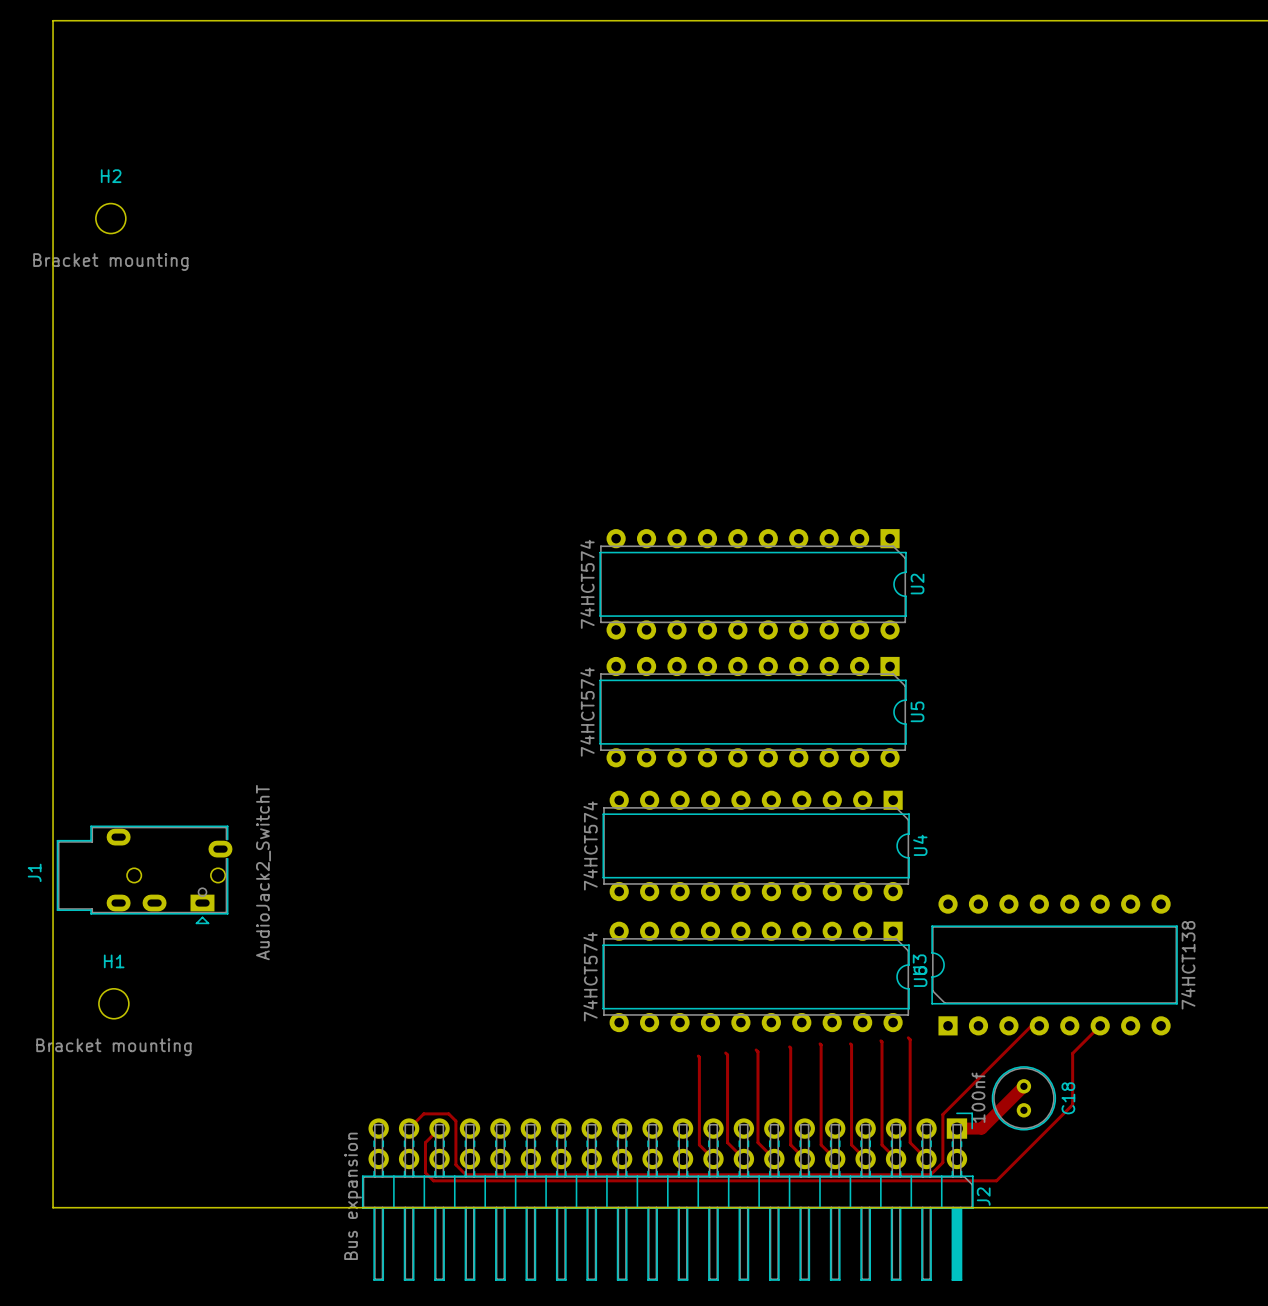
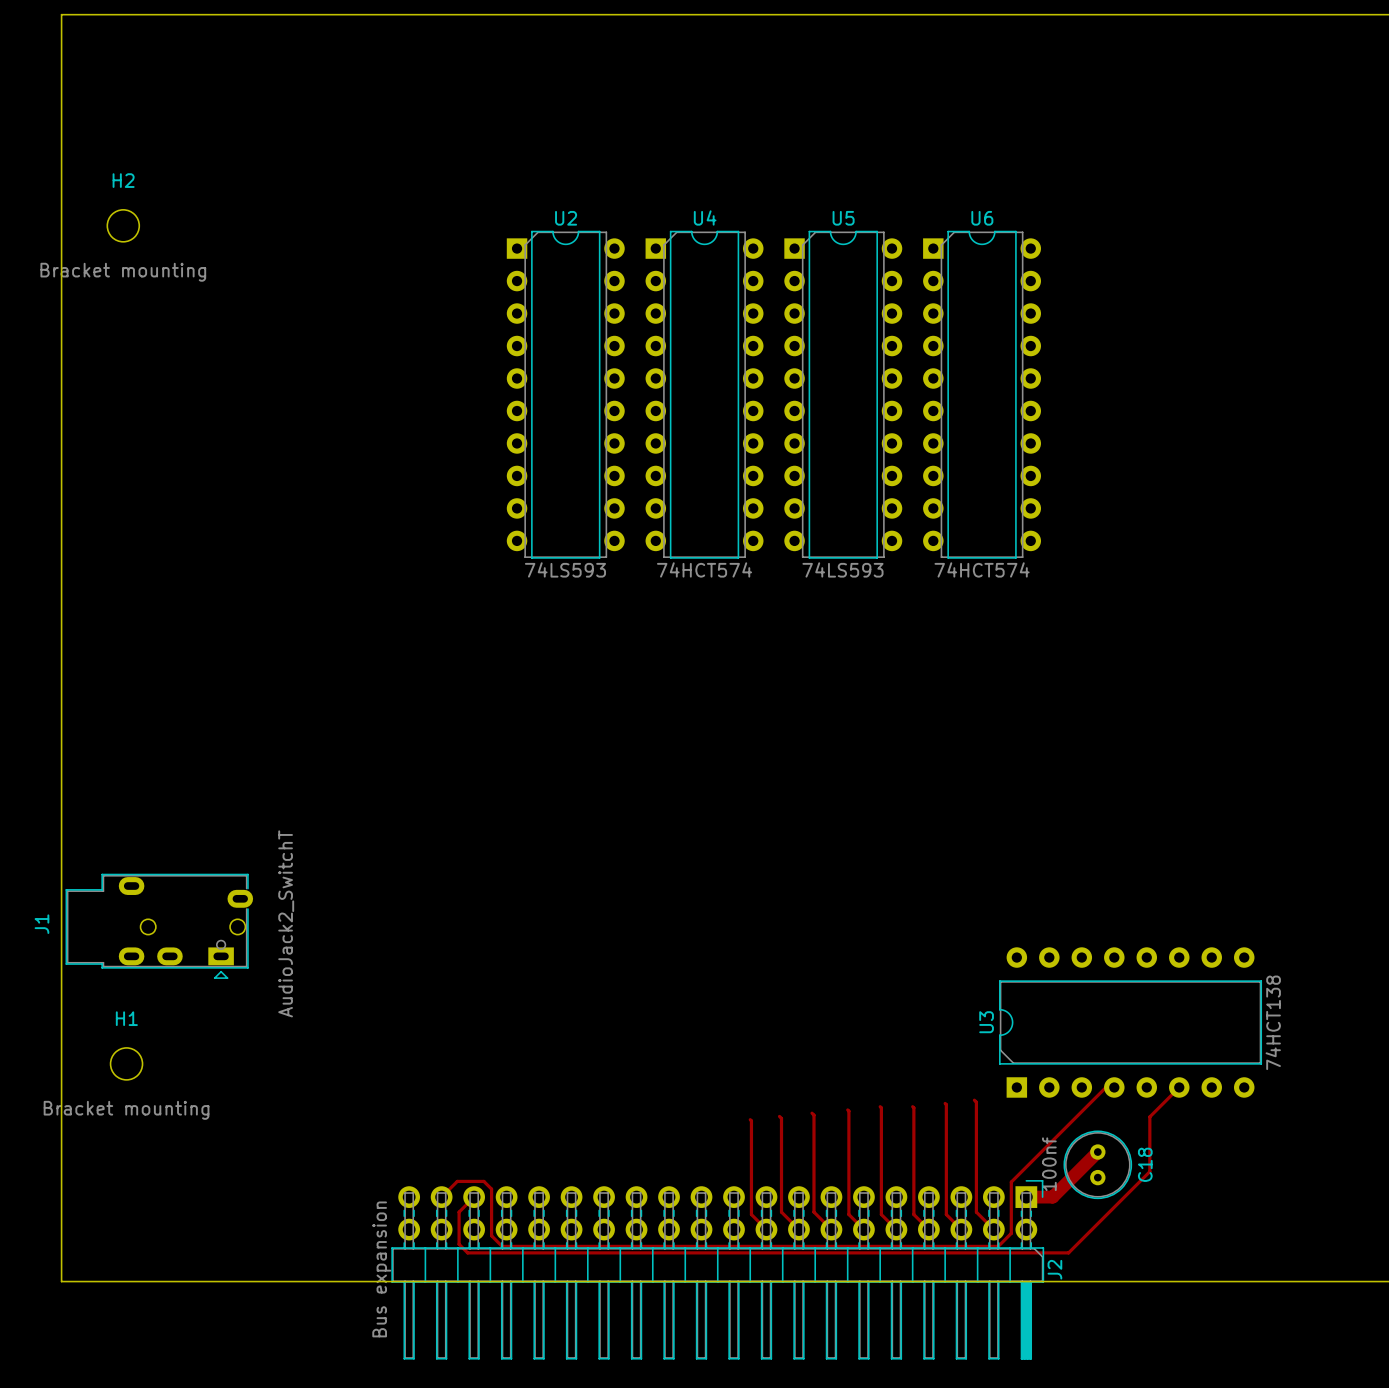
U2 value: 74HCT574 (587, 584) -> 74LS593 (565, 569)
U2 rotation: 0° (753, 584) -> 90° counterclockwise (565, 394)
U2 position: (753, 584) -> (565, 394)
U5 value: 74HCT574 (587, 712) -> 74LS593 (842, 569)
U5 rotation: 0° (753, 712) -> 90° counterclockwise (843, 394)
U5 position: (753, 712) -> (843, 394)
U4 rotation: 0° (756, 845) -> 90° counterclockwise (704, 394)
U4 position: (756, 845) -> (704, 394)
U6 rotation: 0° (756, 976) -> 90° counterclockwise (982, 394)
U6 position: (756, 976) -> (982, 394)

